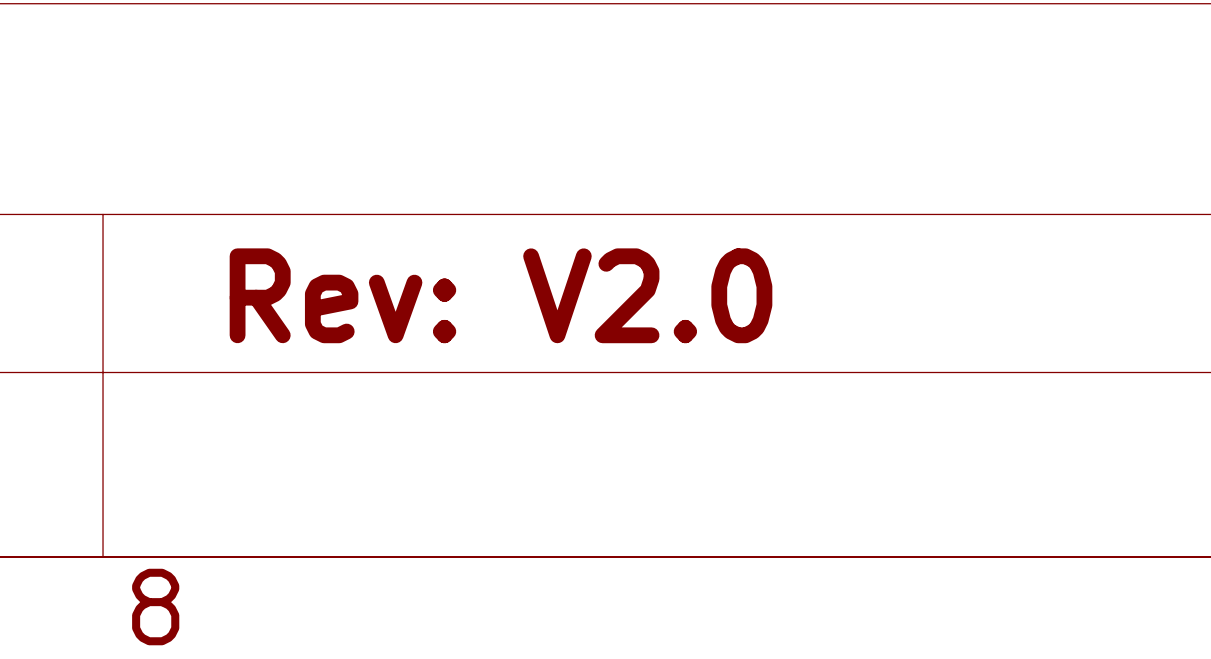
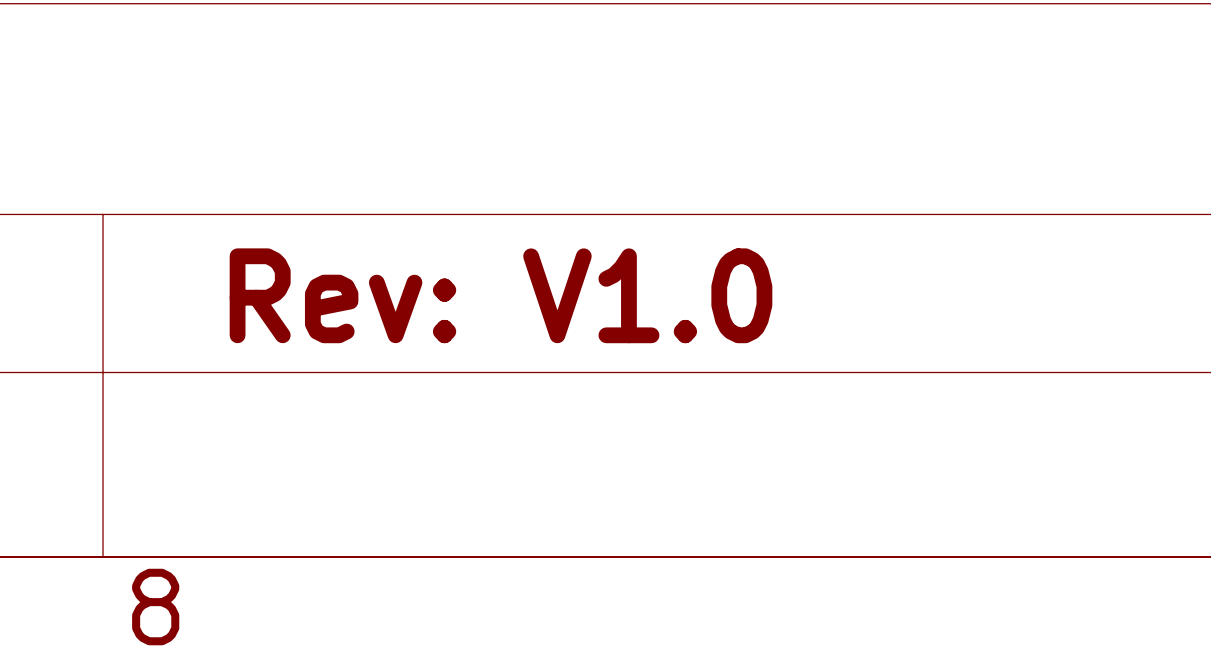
title block: Rev: V2.0 (501, 295) -> Rev: V1.0 (501, 295)

